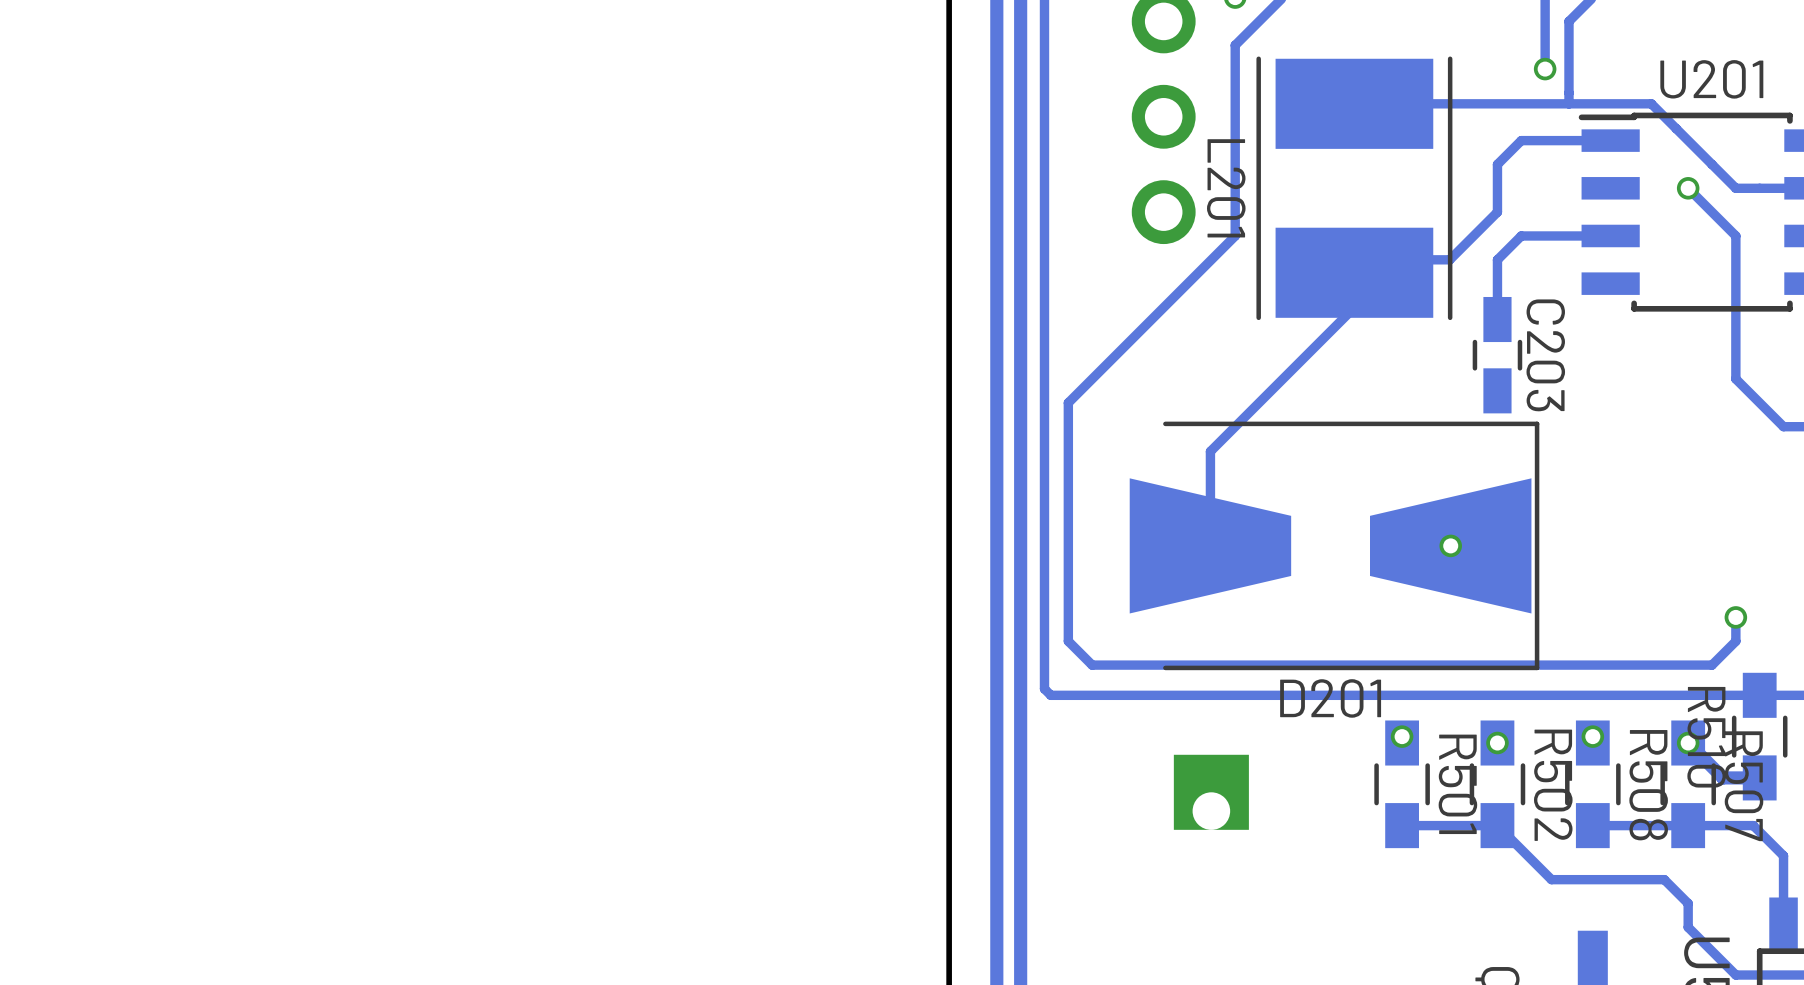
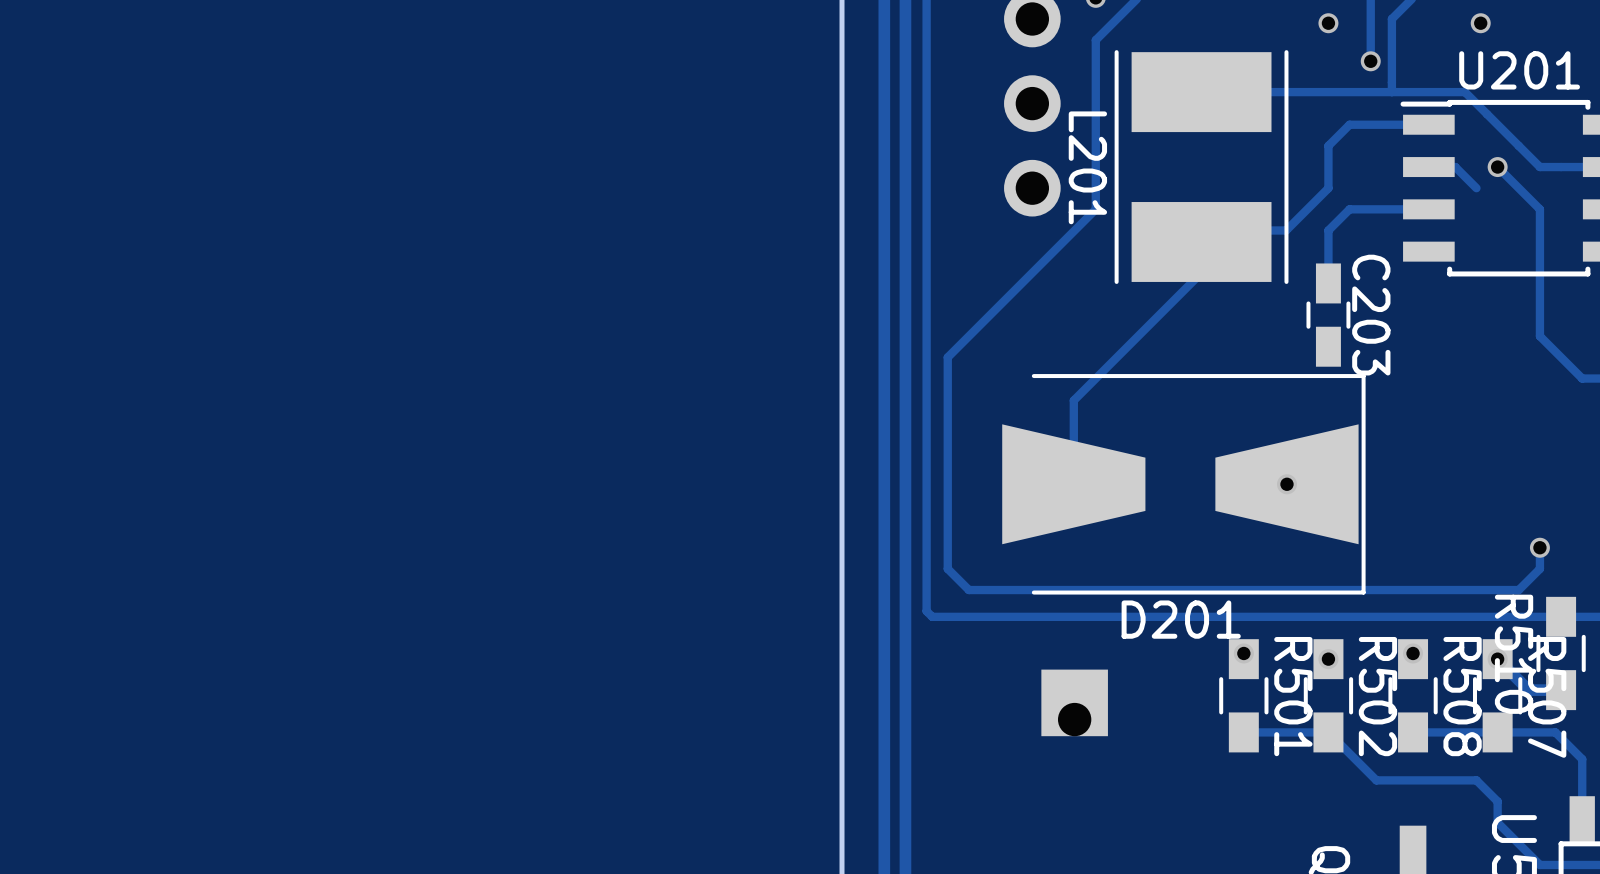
via: none -> (1328, 23)
via: none -> (1480, 23)
track: none -> (1428, 167) (1455, 167) (1476, 188)

